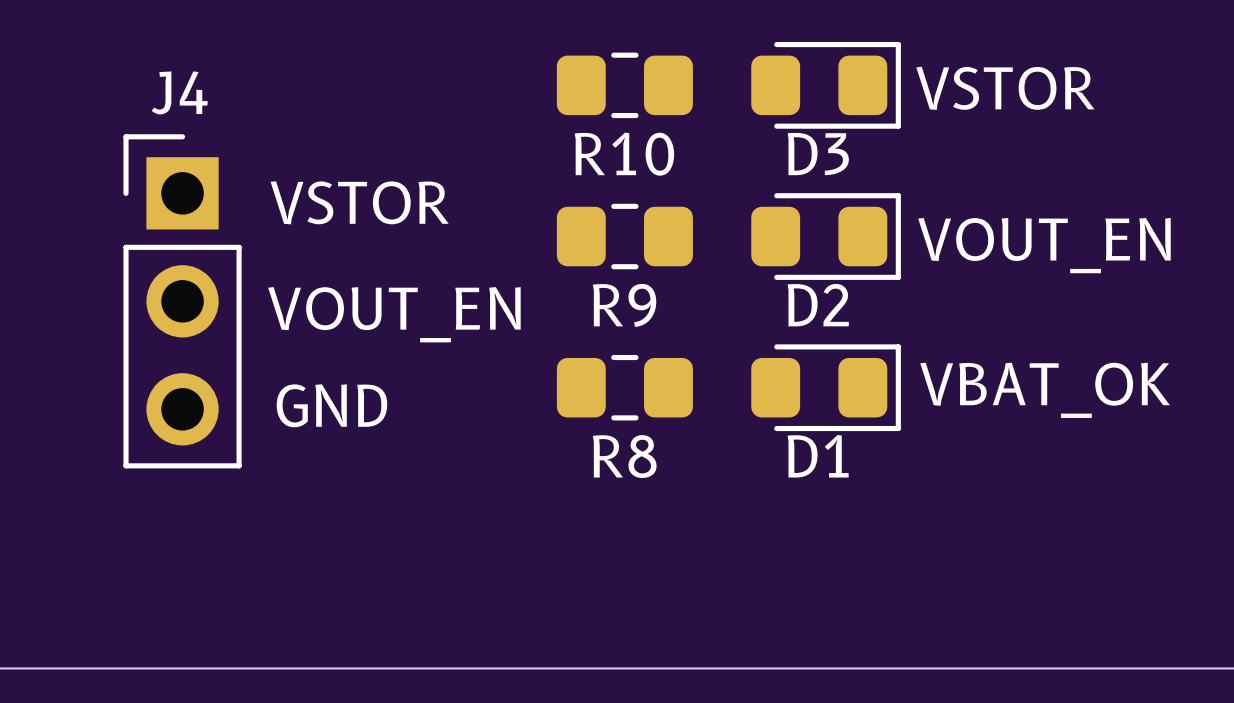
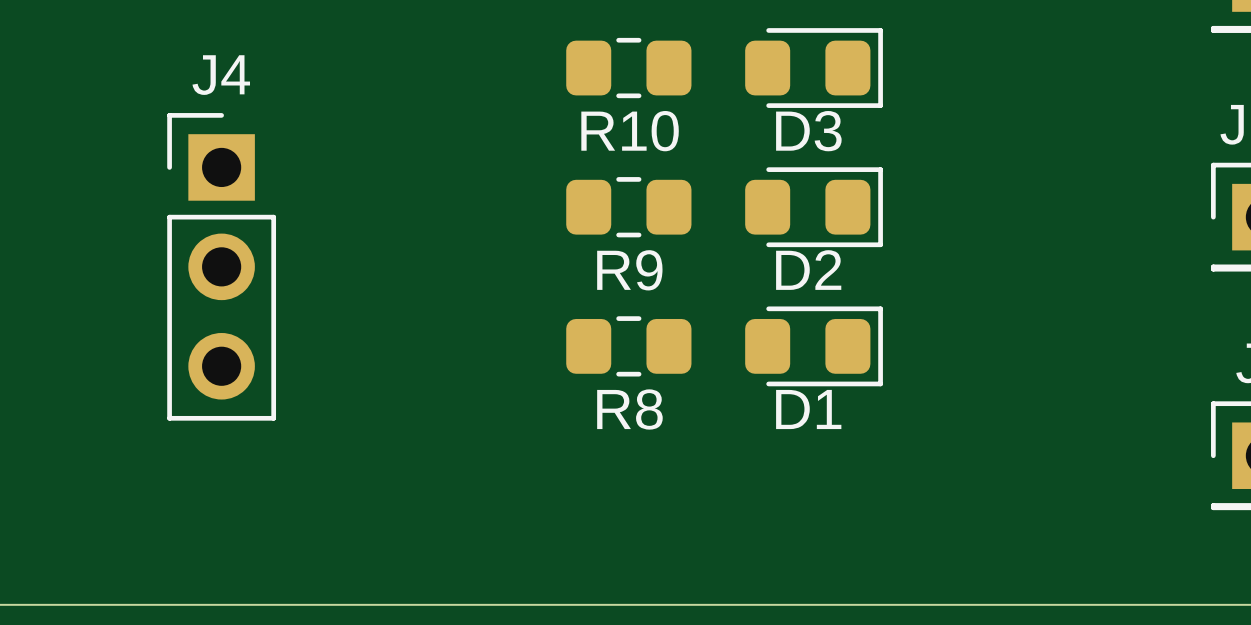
text: VSTOR (1005, 88) -> none
text: VSTOR (359, 202) -> none
text: VOUT_EN (1044, 245) -> none
text: VOUT_EN (394, 314) -> none
text: VBAT_OK (1045, 390) -> none
text: GND (331, 405) -> none

